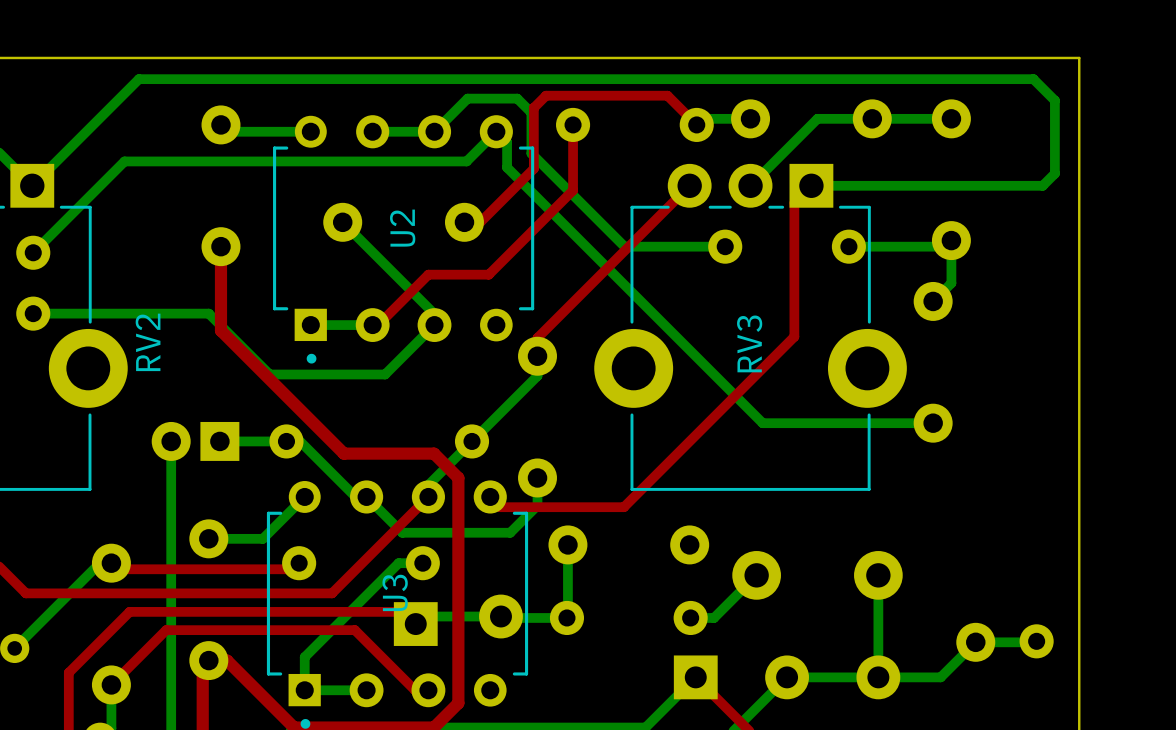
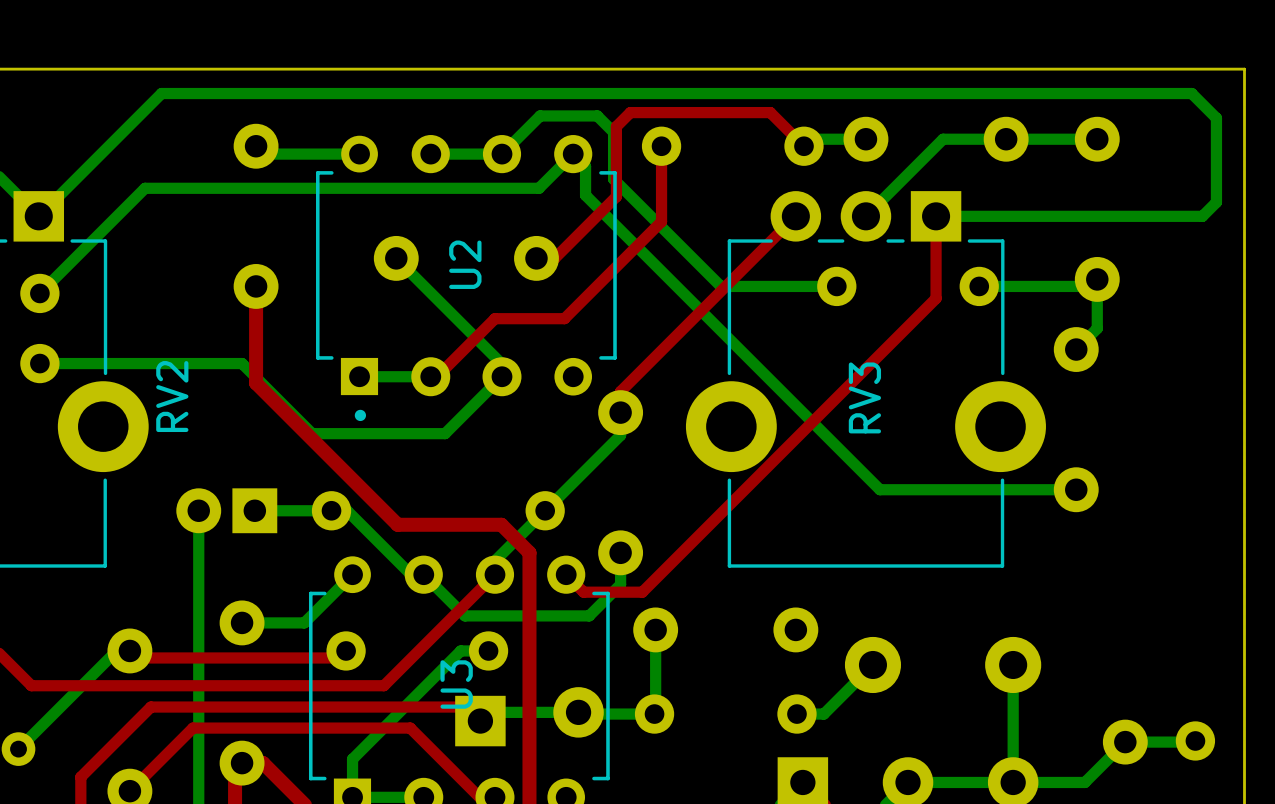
top track: (811, 185) (794, 202) (794, 336) (623, 507) (500, 507) -> (936, 216) (936, 298) (642, 592) (583, 592) (577, 586)

